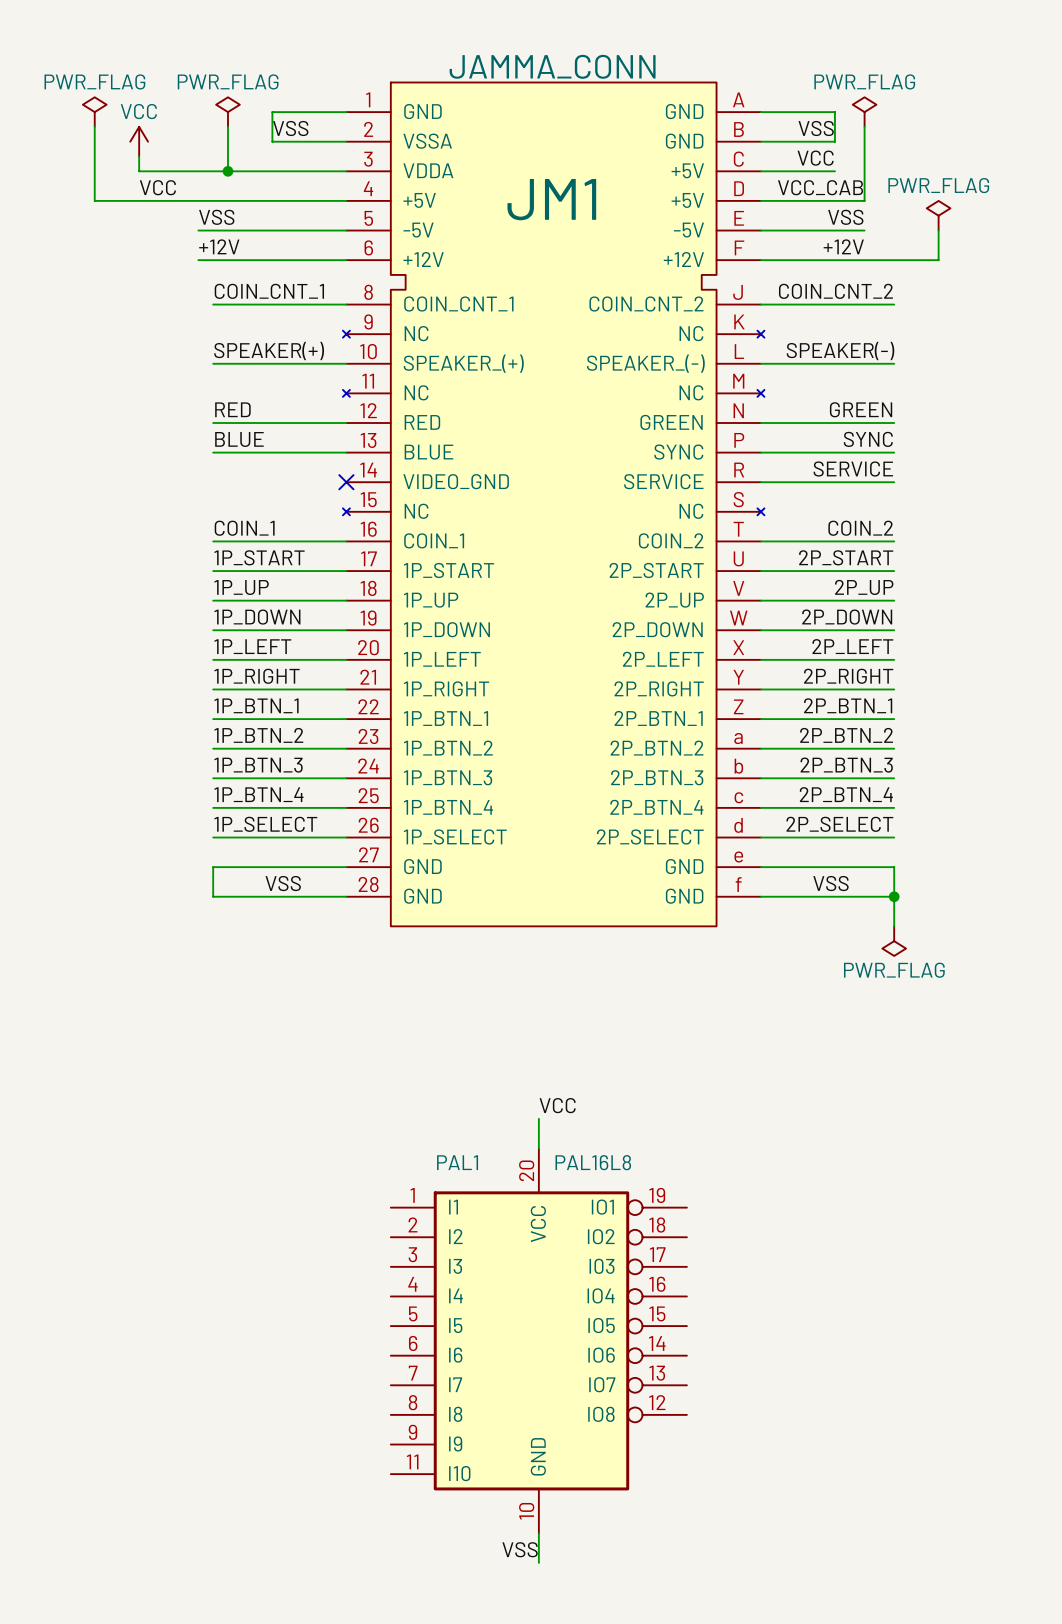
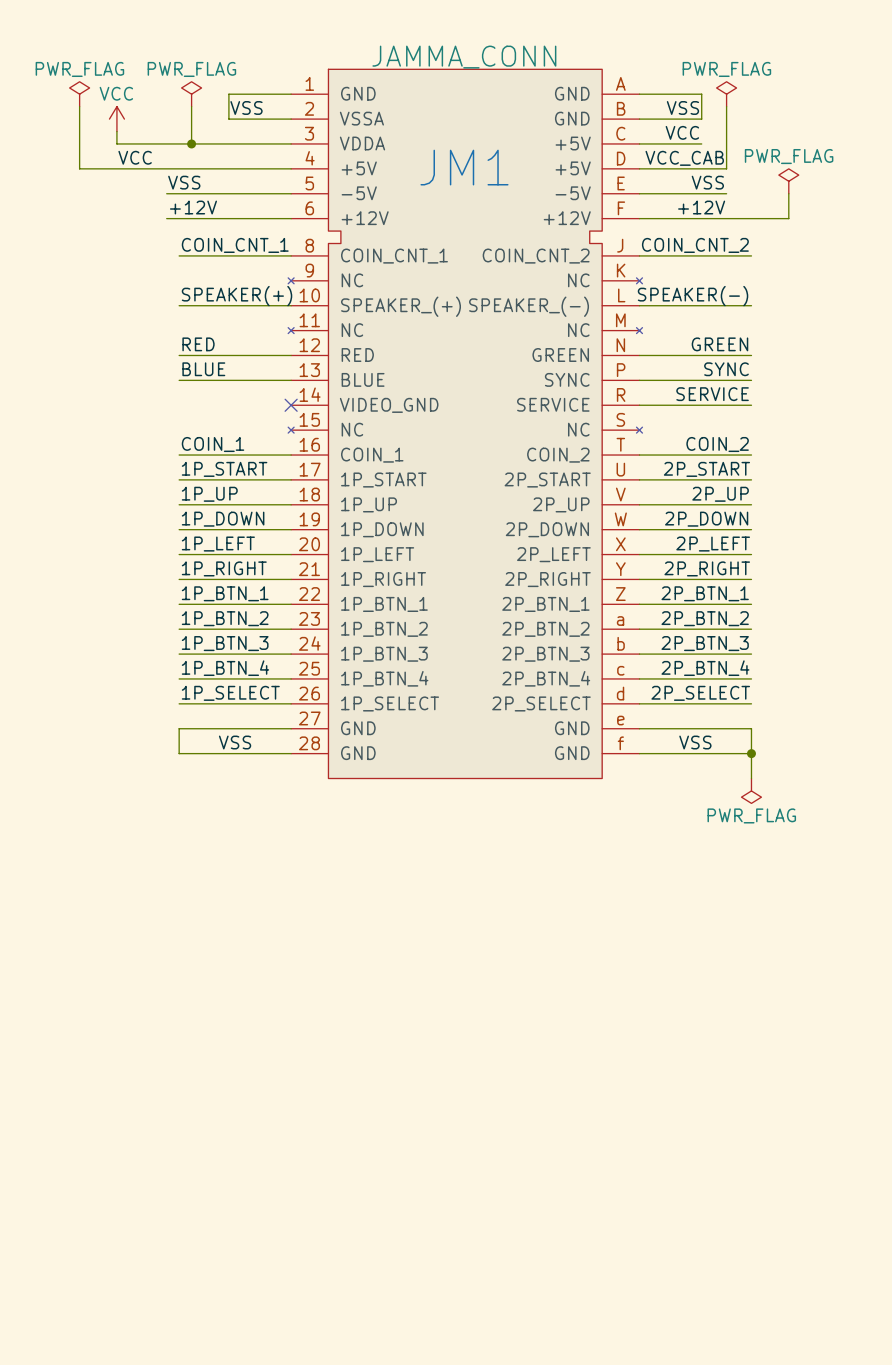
label: VCC (557, 1105) -> none
wire: (538, 1118) (538, 1148) -> none
PAL1: PAL16L8 (538, 1340) -> none
wire: (538, 1533) (538, 1562) -> none
label: VSS (520, 1549) -> none

